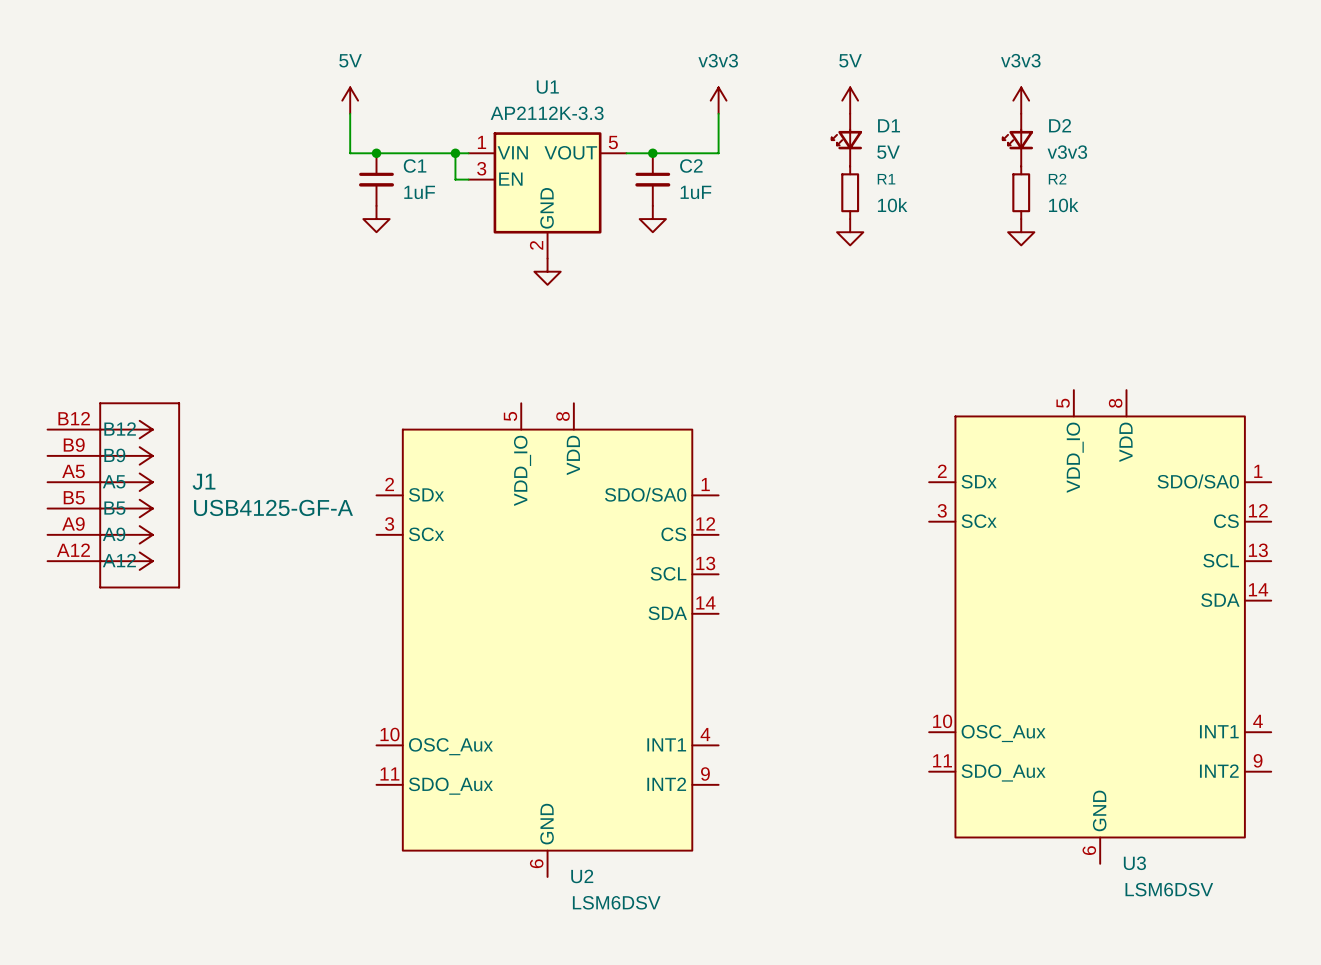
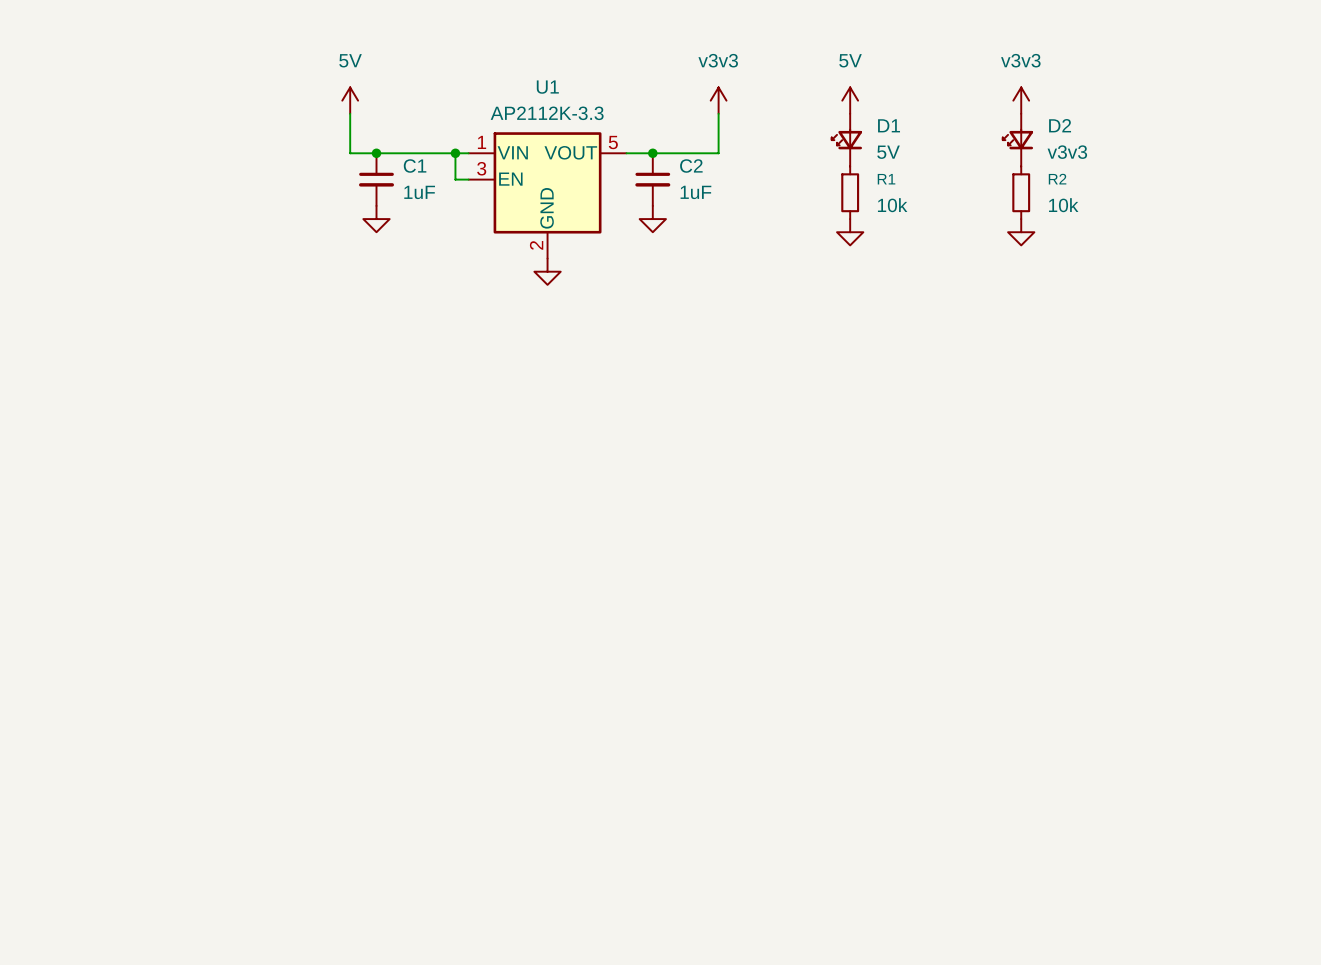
J1: USB4125-GF-A (113, 495) -> none
U3: LSM6DSV (1100, 626) -> none
U2: LSM6DSV (547, 640) -> none

